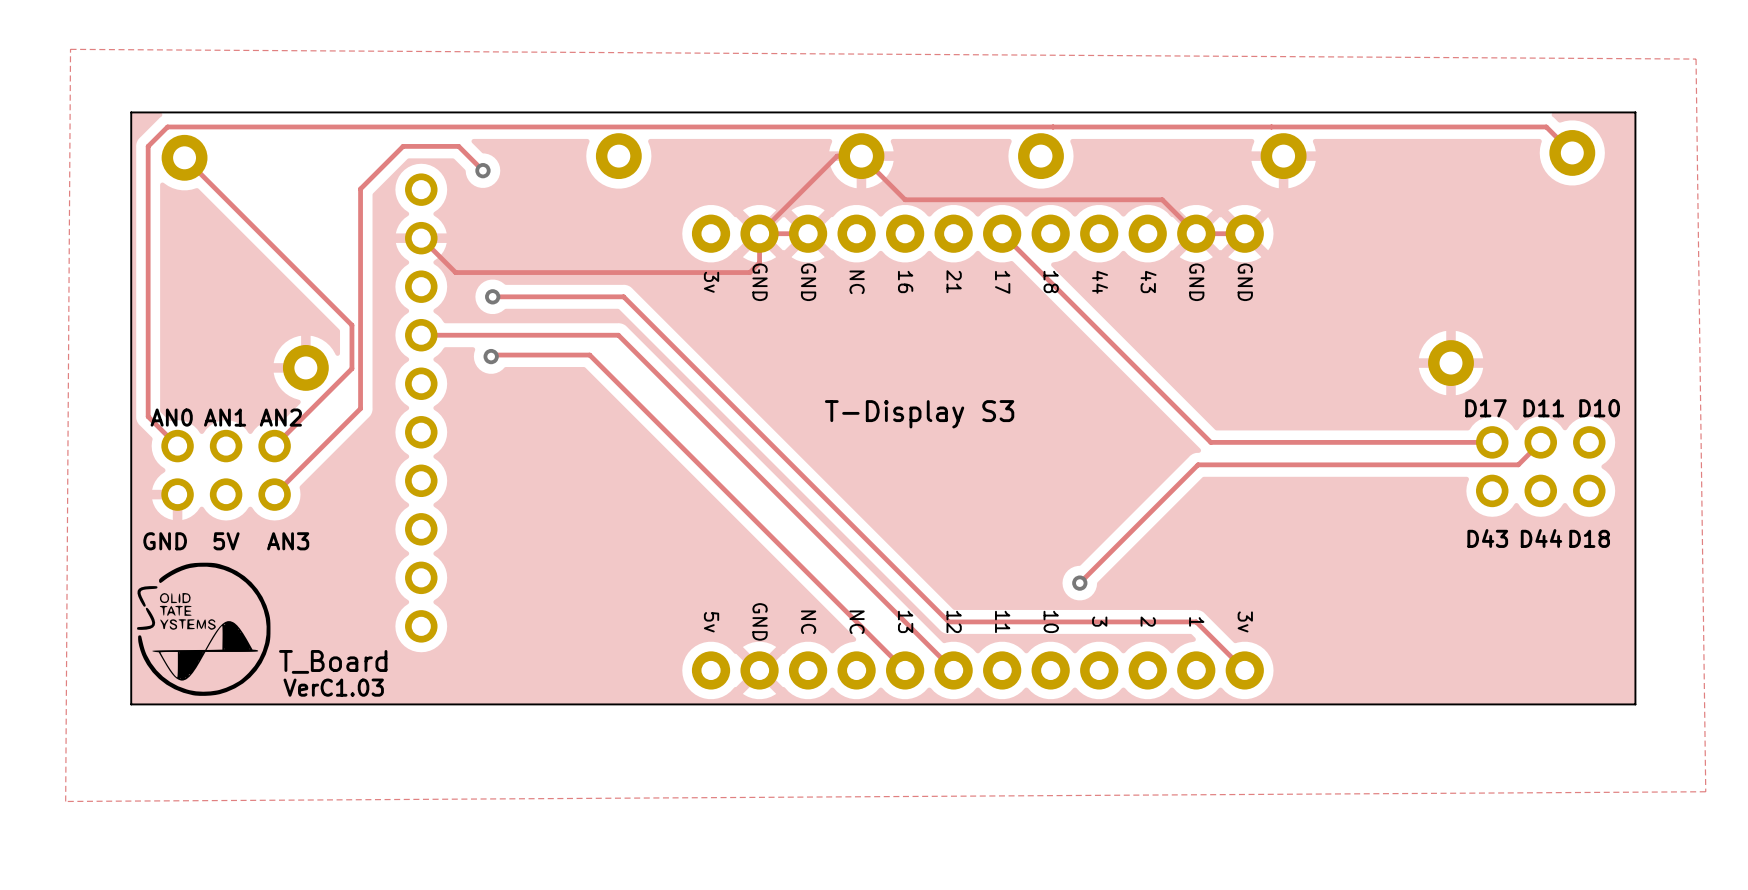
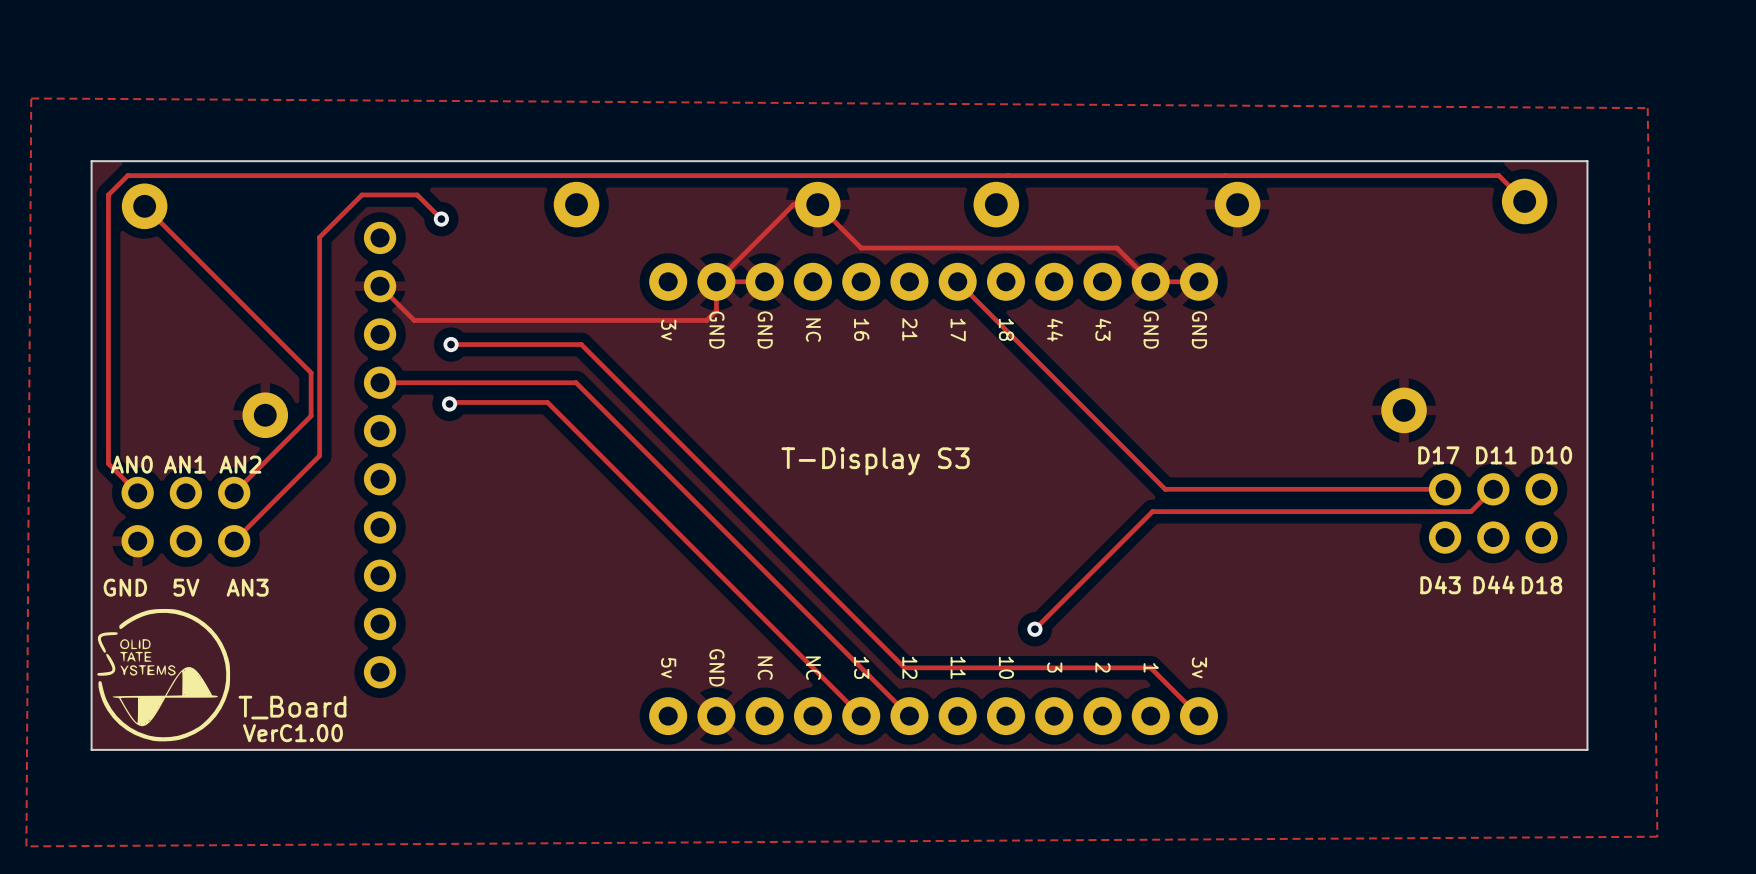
text: VerC1.03 (333, 687) -> VerC1.00 (292, 733)

